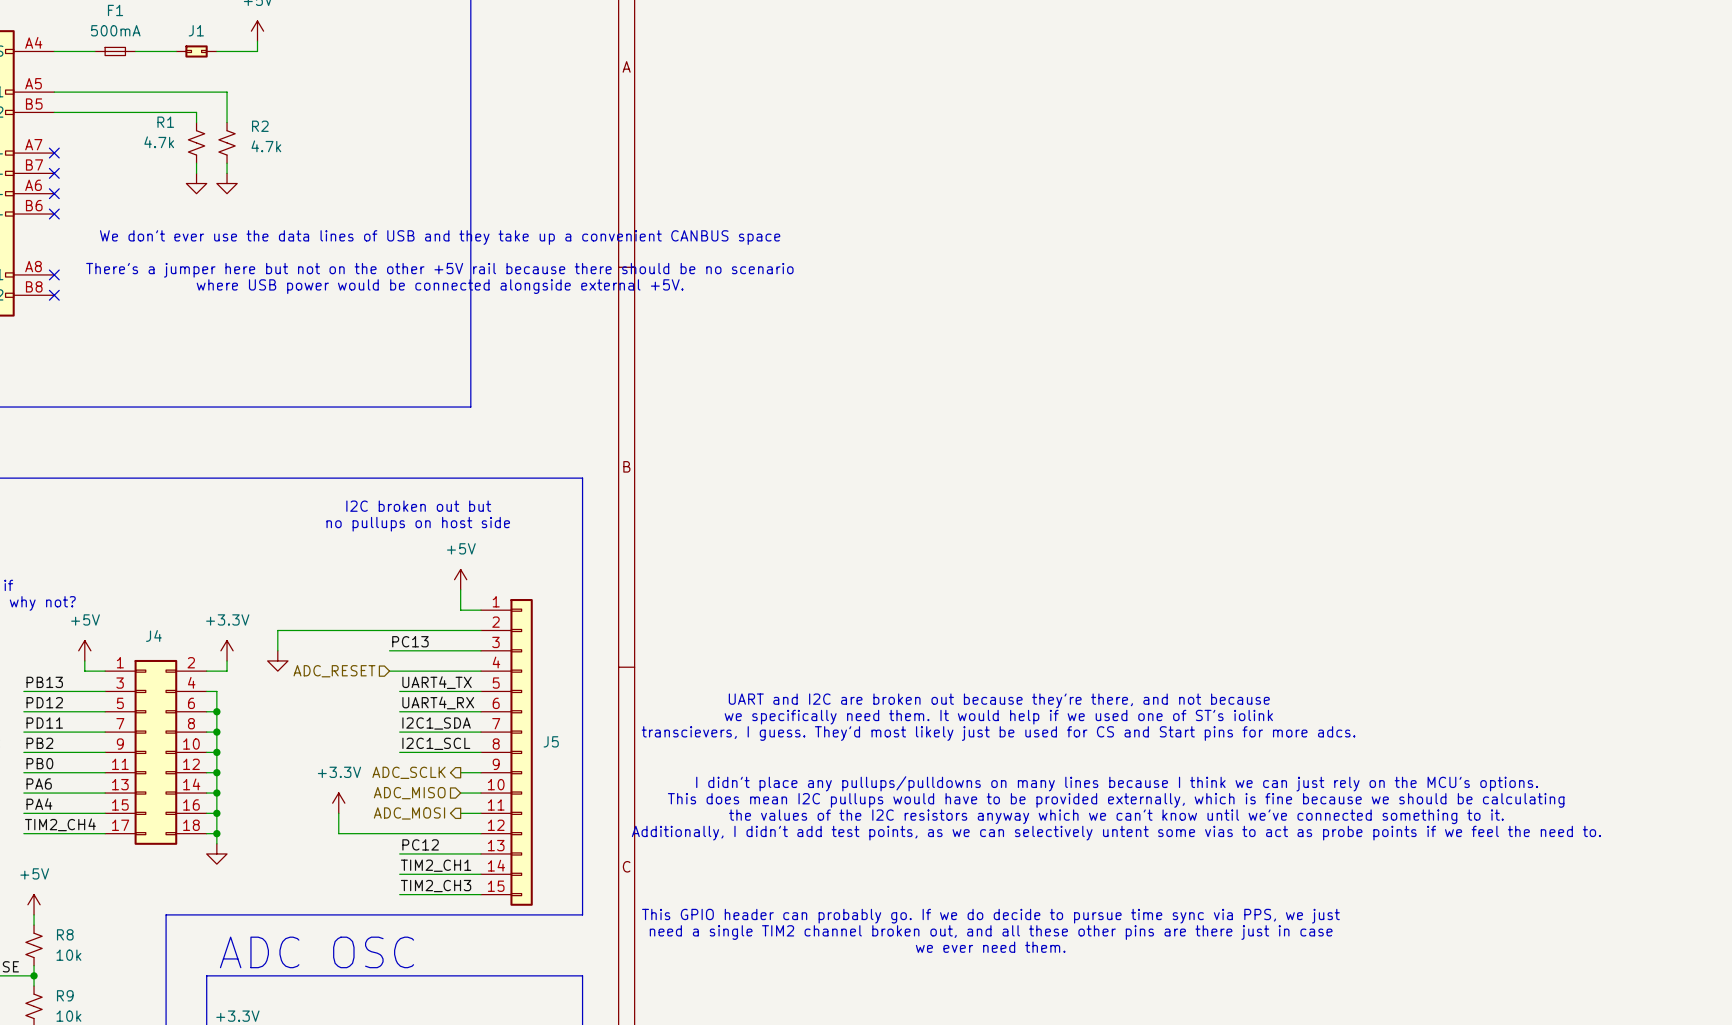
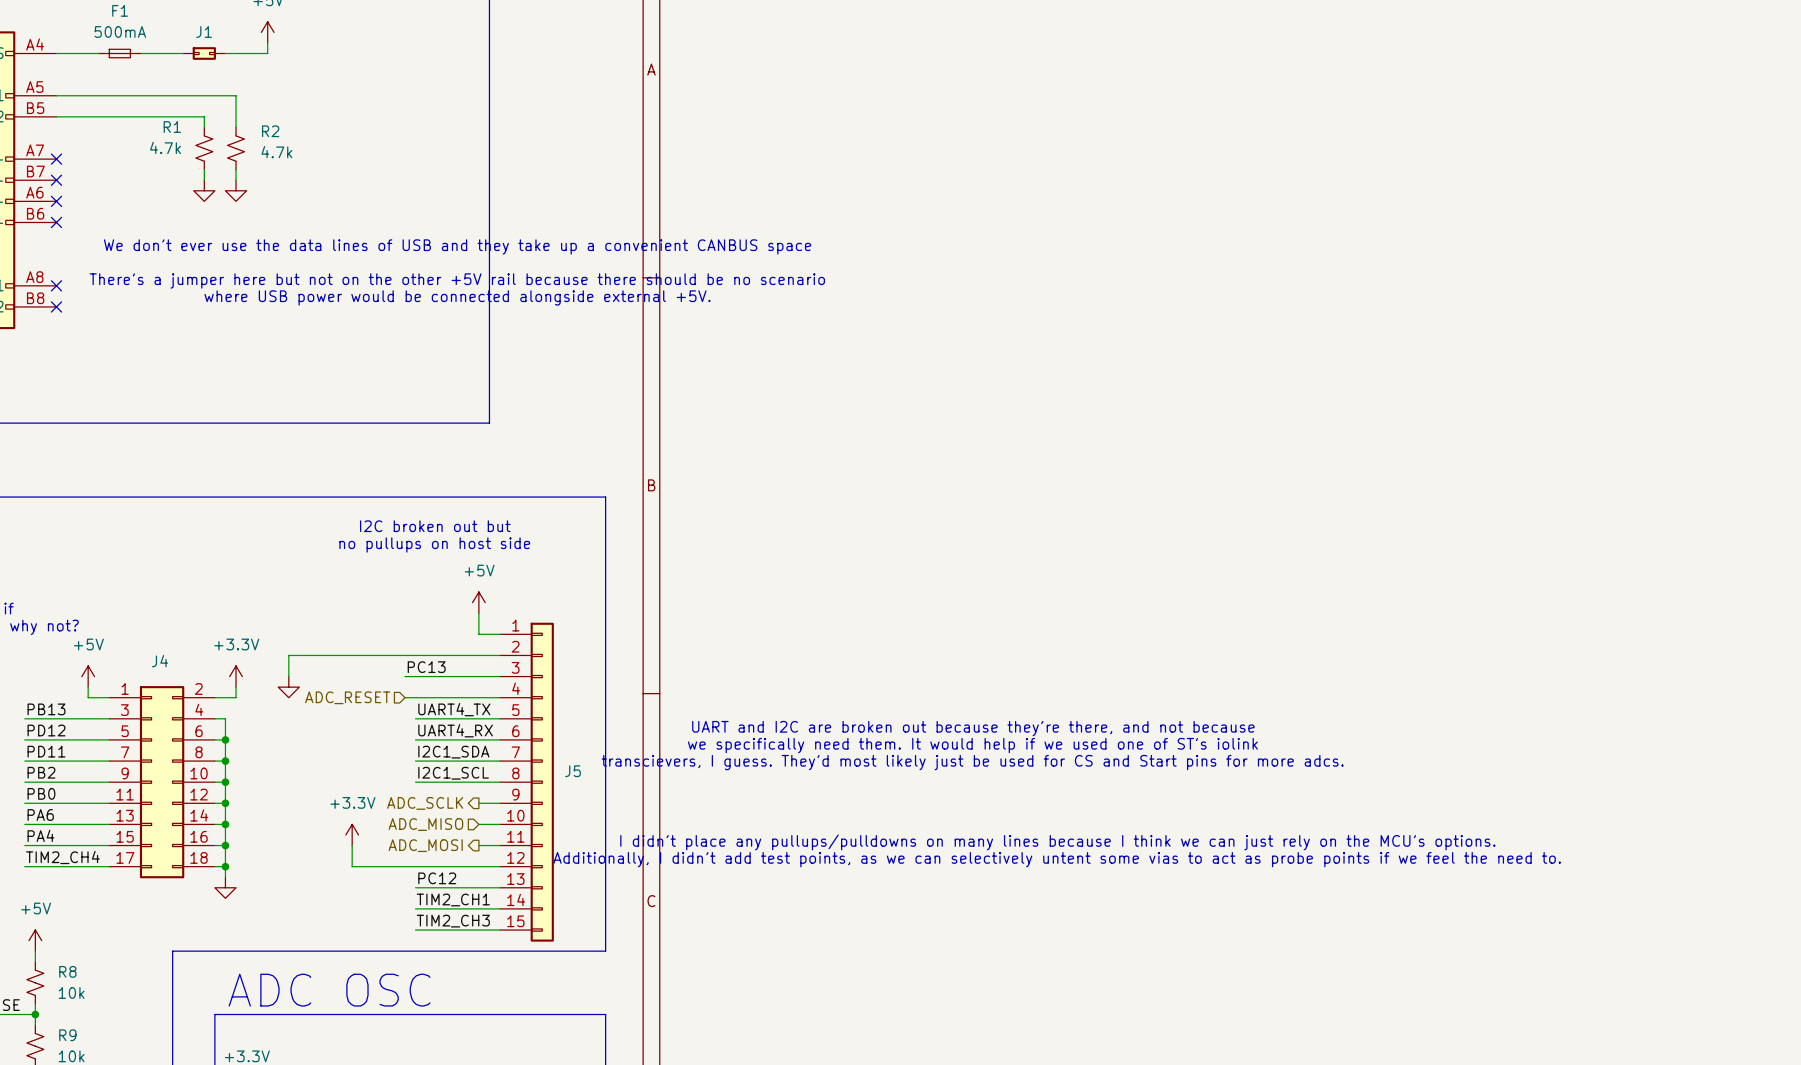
text position: UART and I2C are broken out because they're there, and not because (999, 700) -> UART and I2C are broken out because they're there, and not because (973, 728)
text position: we specifically need them. It would help if we used one of ST's iolink (998, 717) -> we specifically need them. It would help if we used one of ST's iolink (972, 745)
text position: transcievers, I guess. They'd most likely just be used for CS and Start pins for more adcs. (998, 733) -> transcievers, I guess. They'd most likely just be used for CS and Start pins for more adcs. (972, 762)
text position: I didn't place any pullups/pulldowns on many lines because I think we can just rely on the MCU's options. (1117, 783) -> I didn't place any pullups/pulldowns on many lines because I think we can just rely on the MCU's options. (1057, 842)
text: This does mean I2C pullups would have to be provided externally, which is fine because we should be calculating (1116, 800) -> none
text: the values of the I2C resistors anyway which we can't know until we've connected something to it. (1116, 816) -> none
text position: Additionally, I didn't add test points, as we can selectively untent some vias to act as probe points if we feel the need to. (1116, 833) -> Additionally, I didn't add test points, as we can selectively untent some vias to act as probe points if we feel the need to. (1057, 859)
text: This GPIO header can probably go. If we do decide to pursue time sync via PPS, we just (990, 916) -> none
text: need a single TIM2 channel broken out, and all these other pins are there just in case (991, 932) -> none
text: we ever need them. (990, 947) -> none

